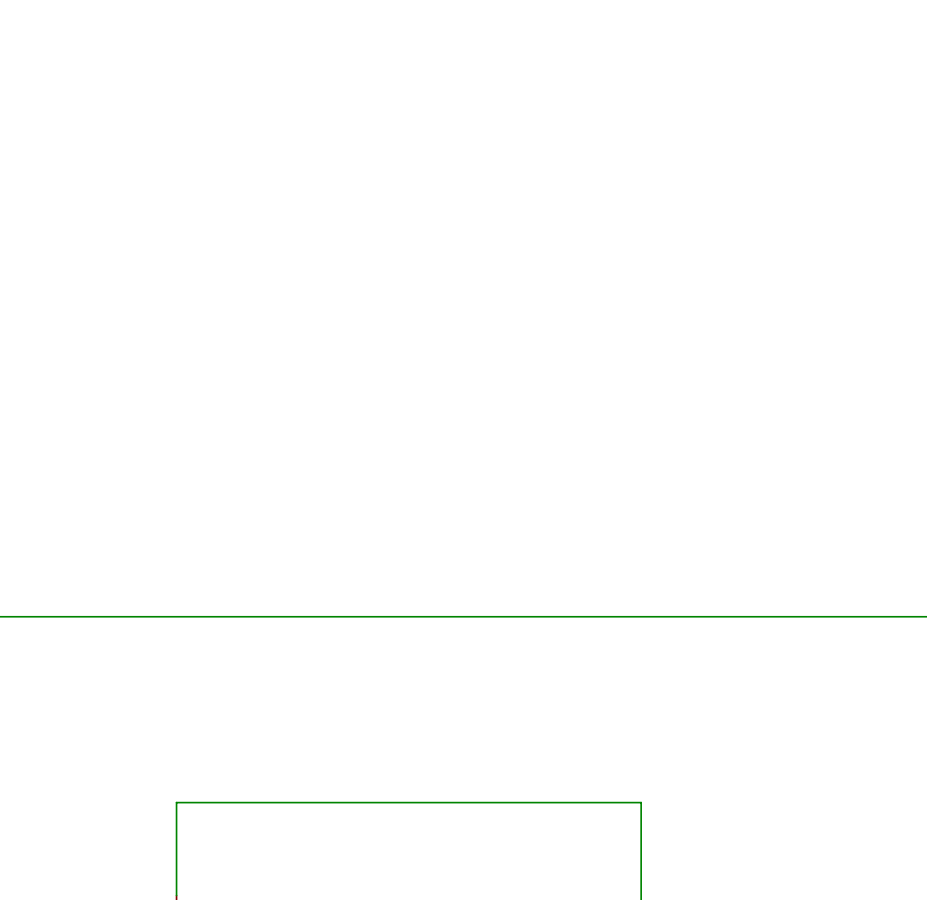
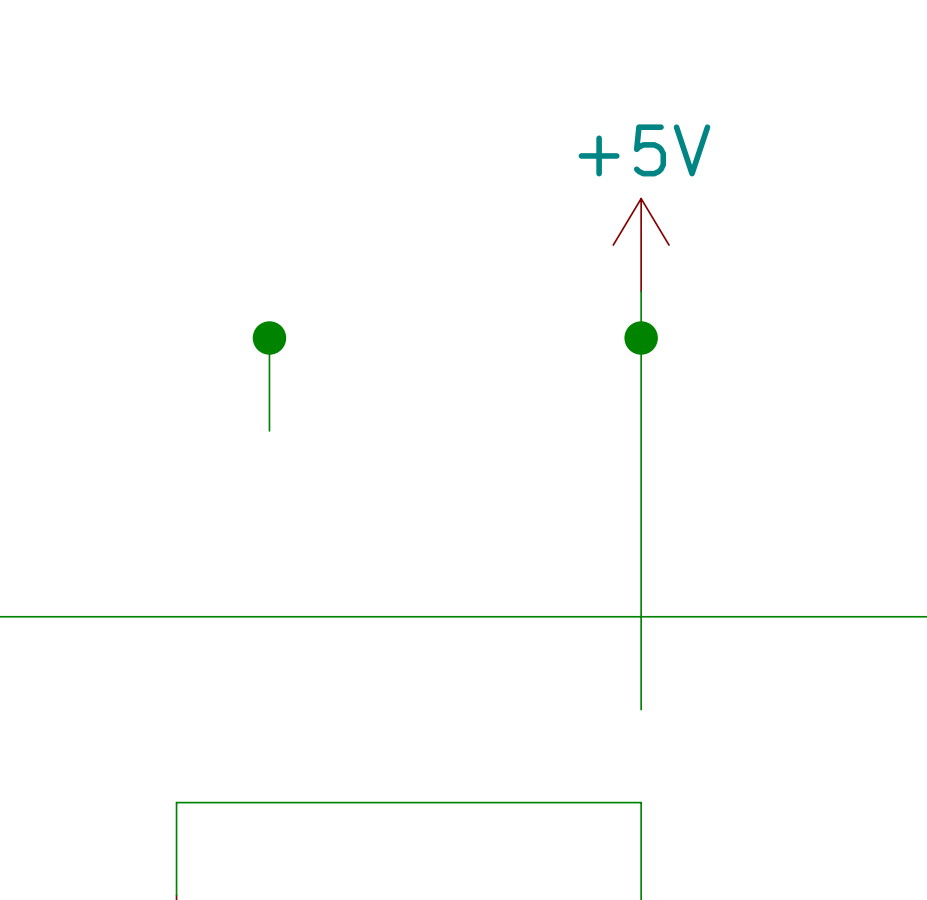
power symbol: none -> +5V (641, 245)
wire: none -> (641, 291) (641, 709)
wire: none -> (269, 338) (269, 430)
junction: none -> (269, 338)
junction: none -> (641, 338)

